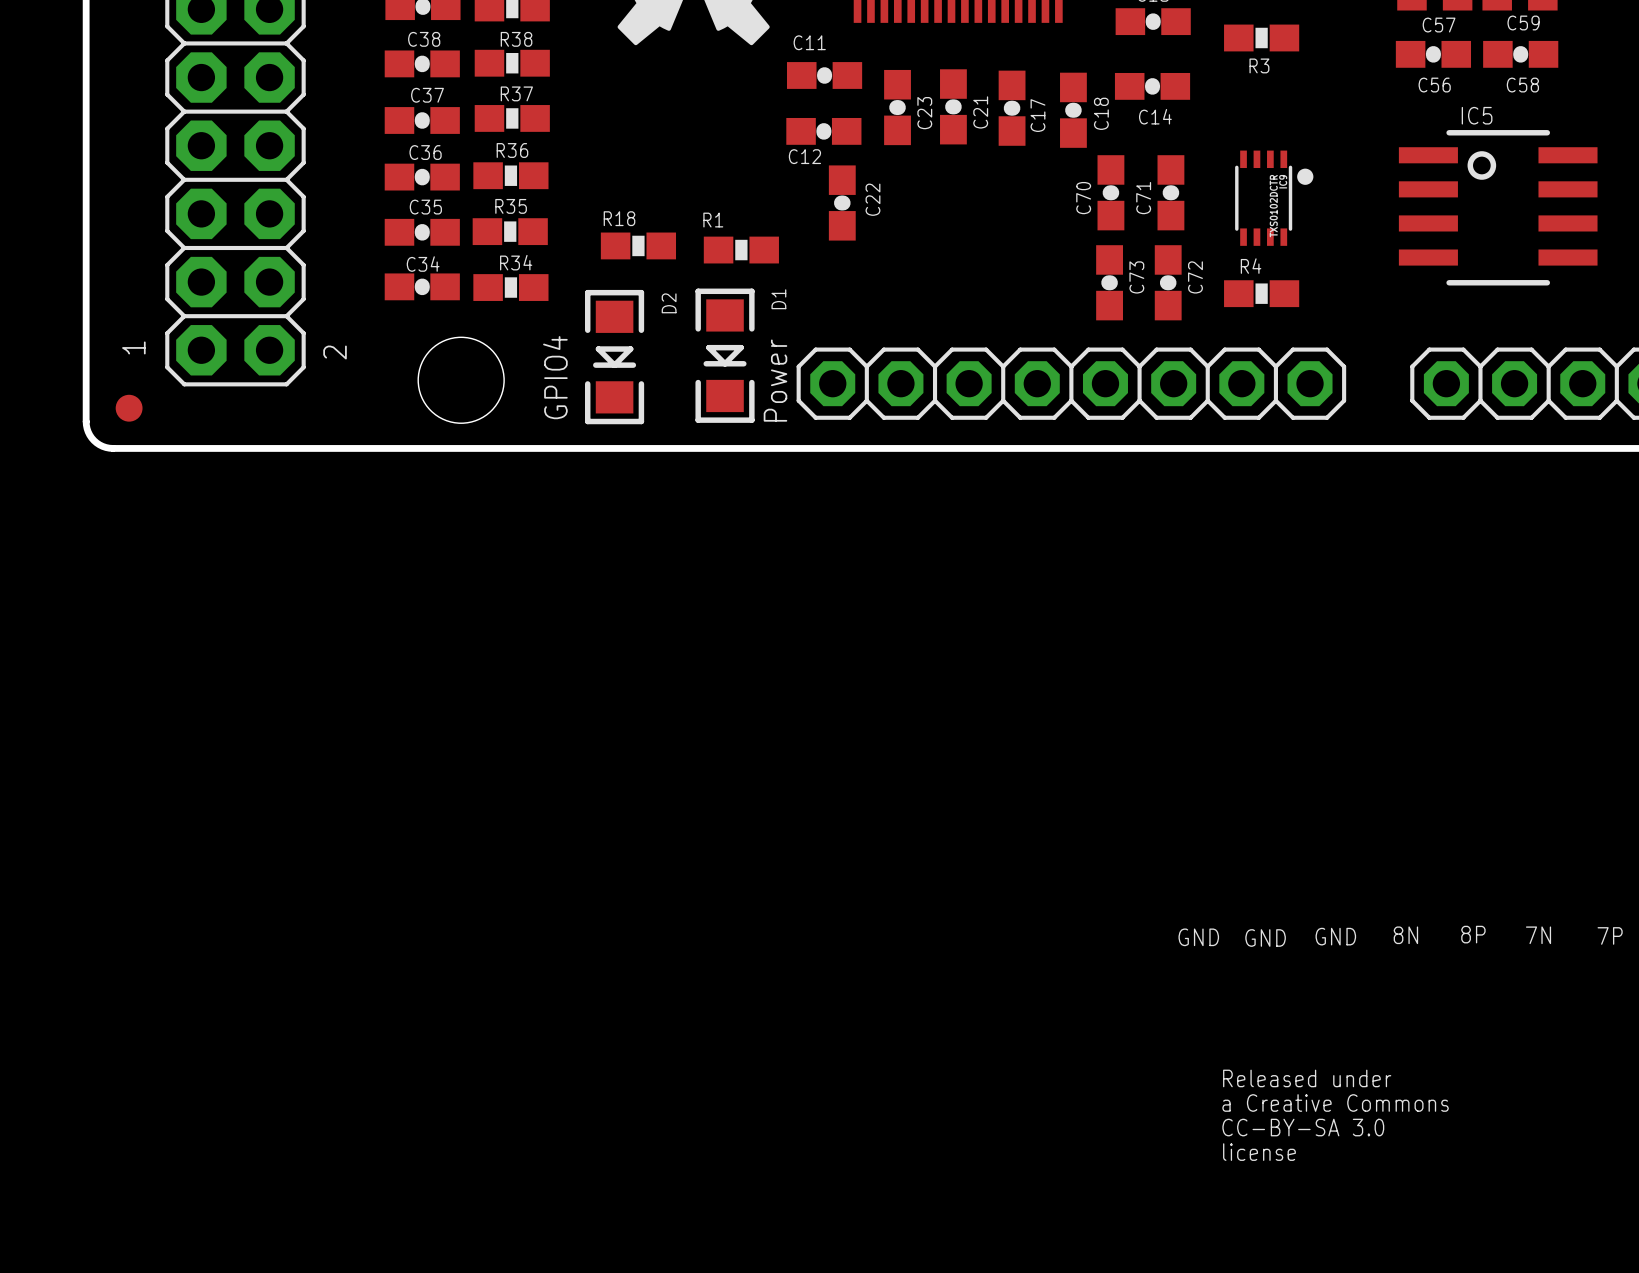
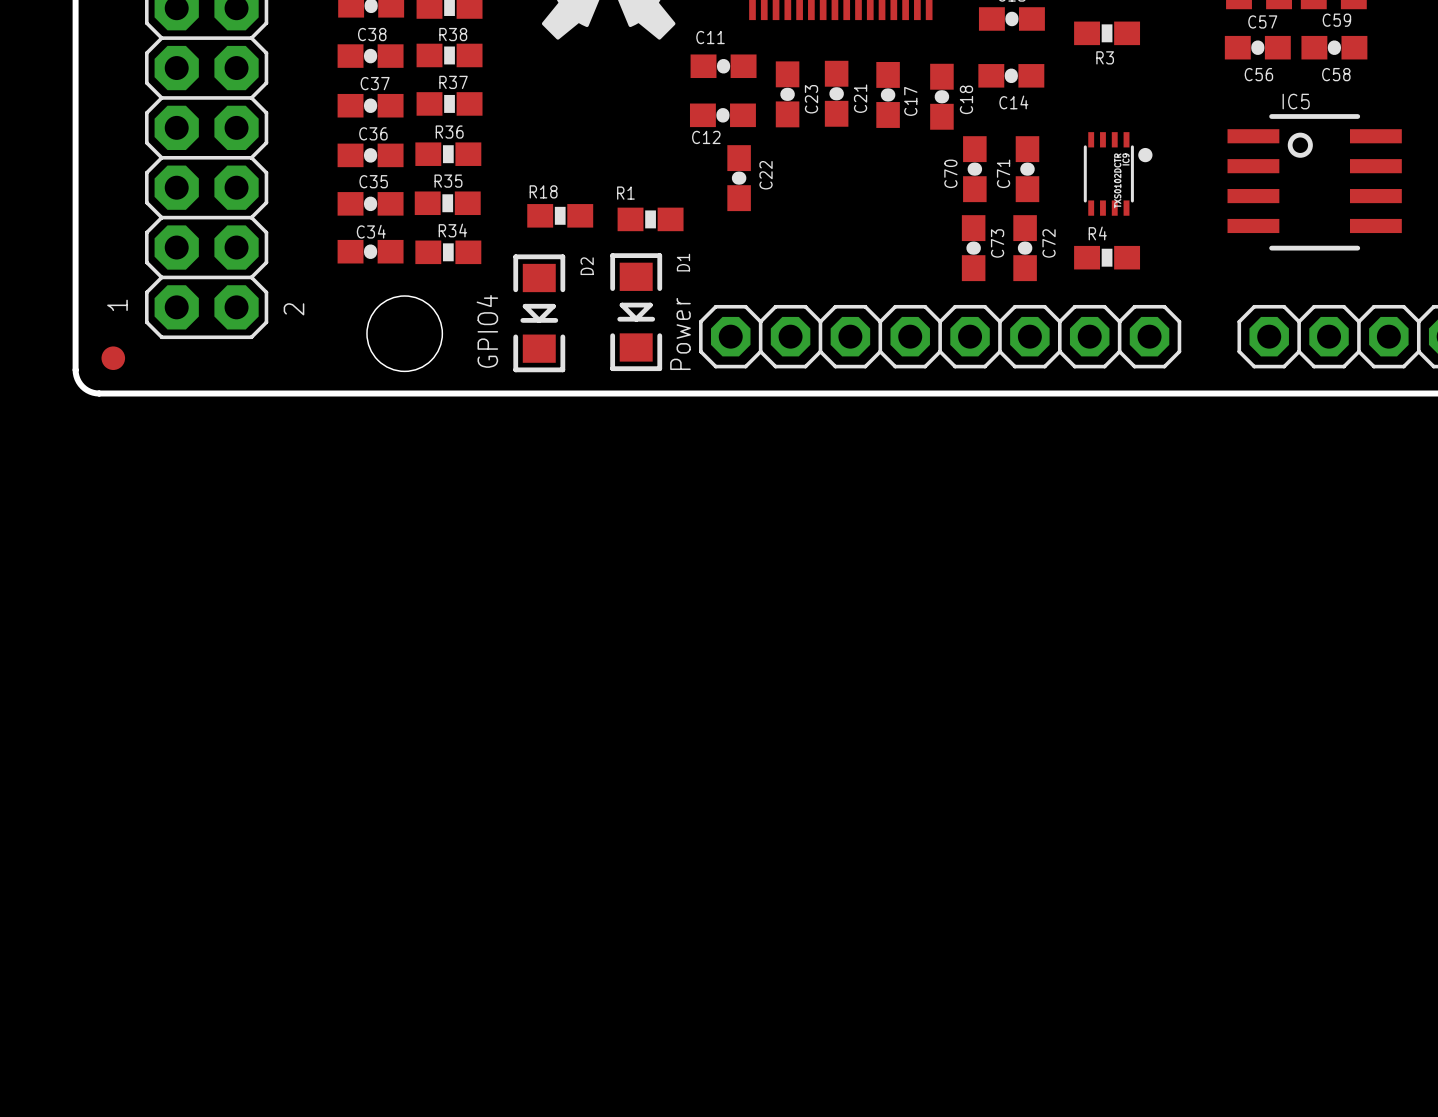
text: 8P (1473, 934) -> none
text: 8N (1405, 935) -> none
text: 7N (1538, 935) -> none
text: 7P (1610, 935) -> none
text: GND (1335, 936) -> none
text: GND (1198, 937) -> none
text: GND (1265, 937) -> none
text: Released under (1307, 1078) -> none
text: a Creative Commons (1335, 1102) -> none
text: CC-BY-SA 3.0 (1303, 1127) -> none
text: license (1259, 1152) -> none

